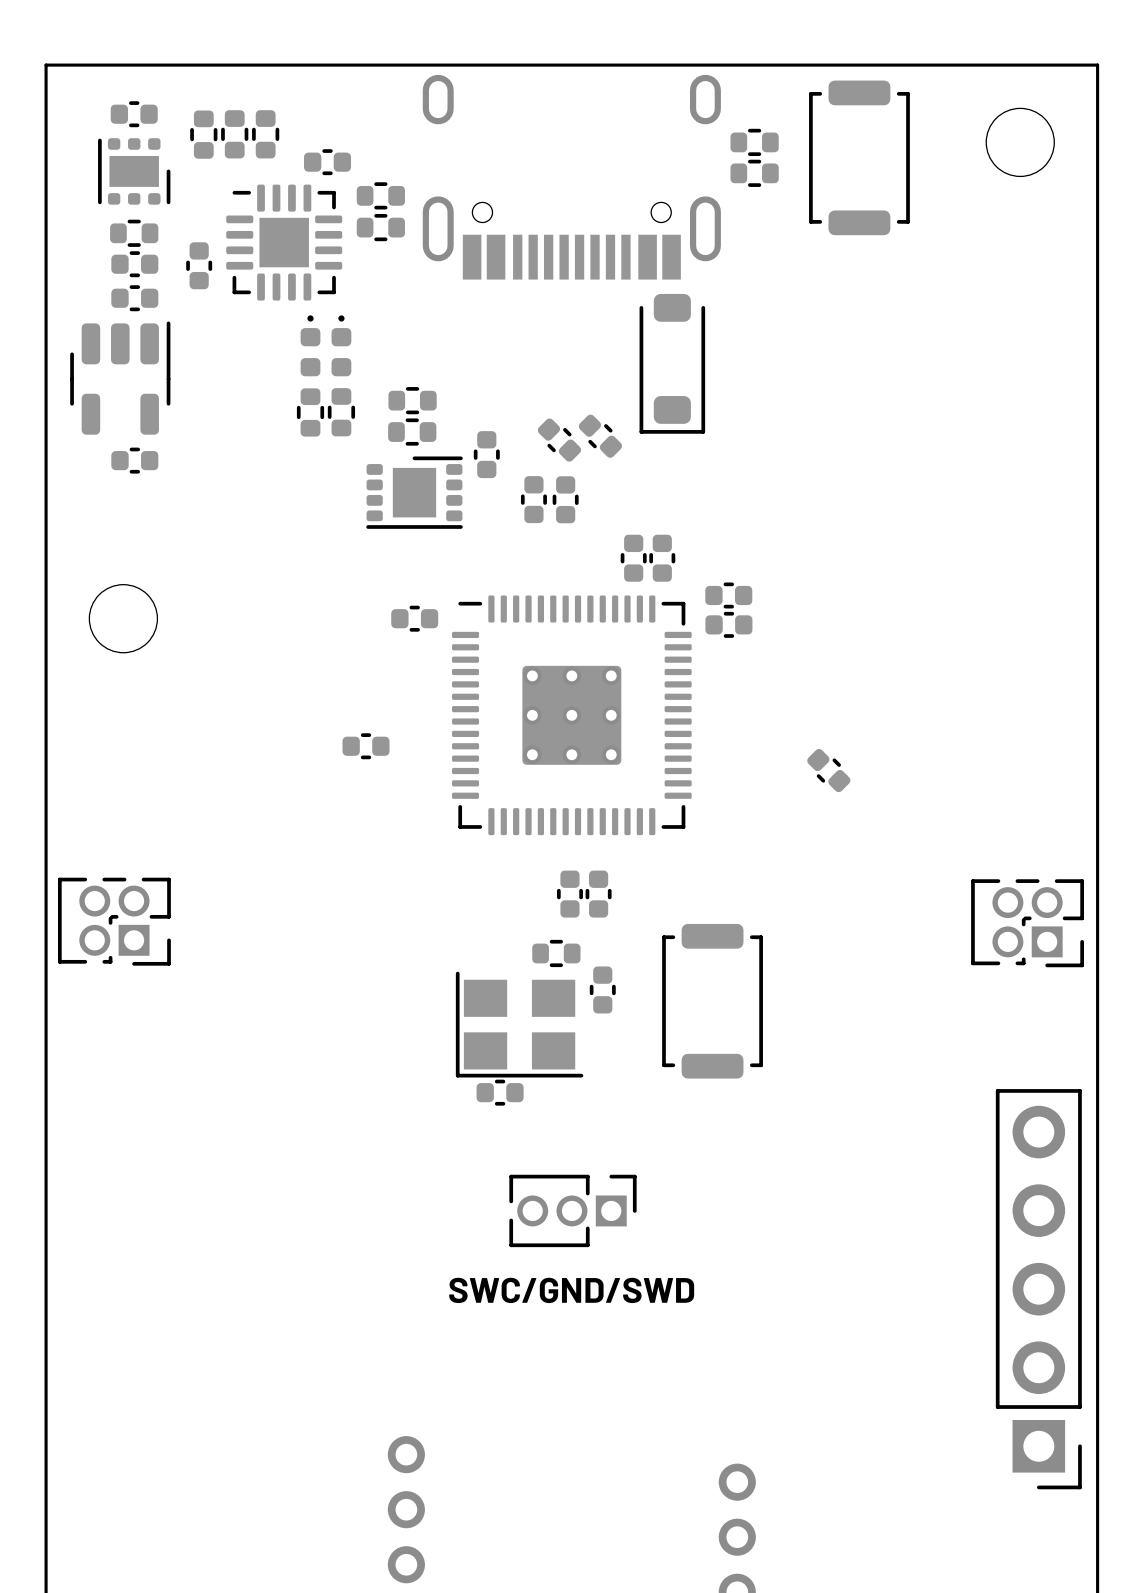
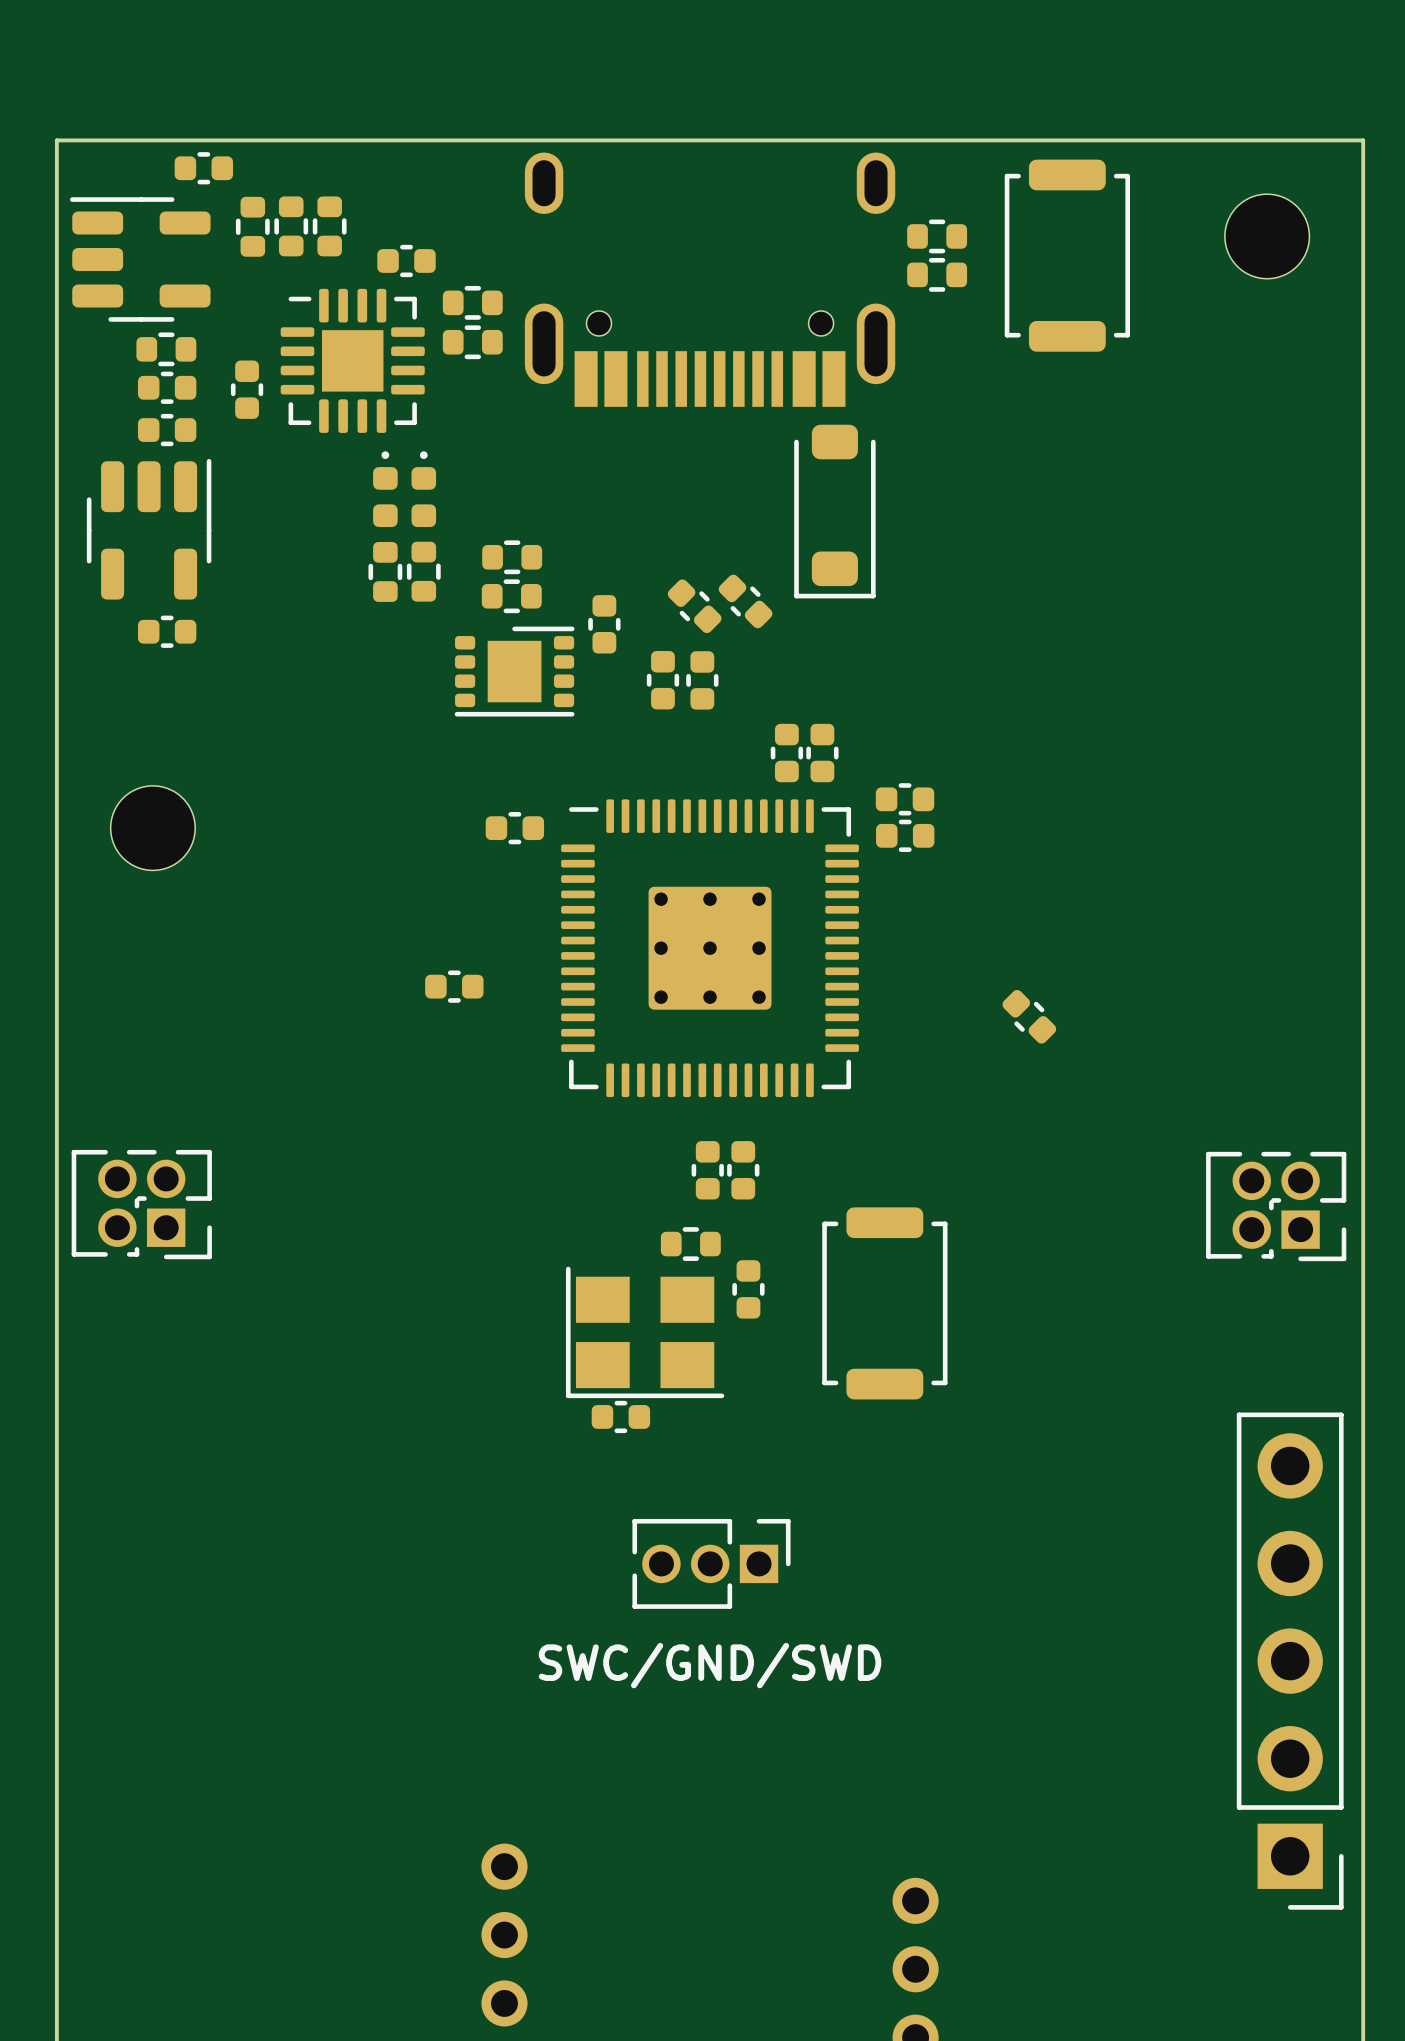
part position: (134, 114) -> (203, 168)
part footprint: [98, 138, 171, 205] -> [69, 197, 211, 322]

